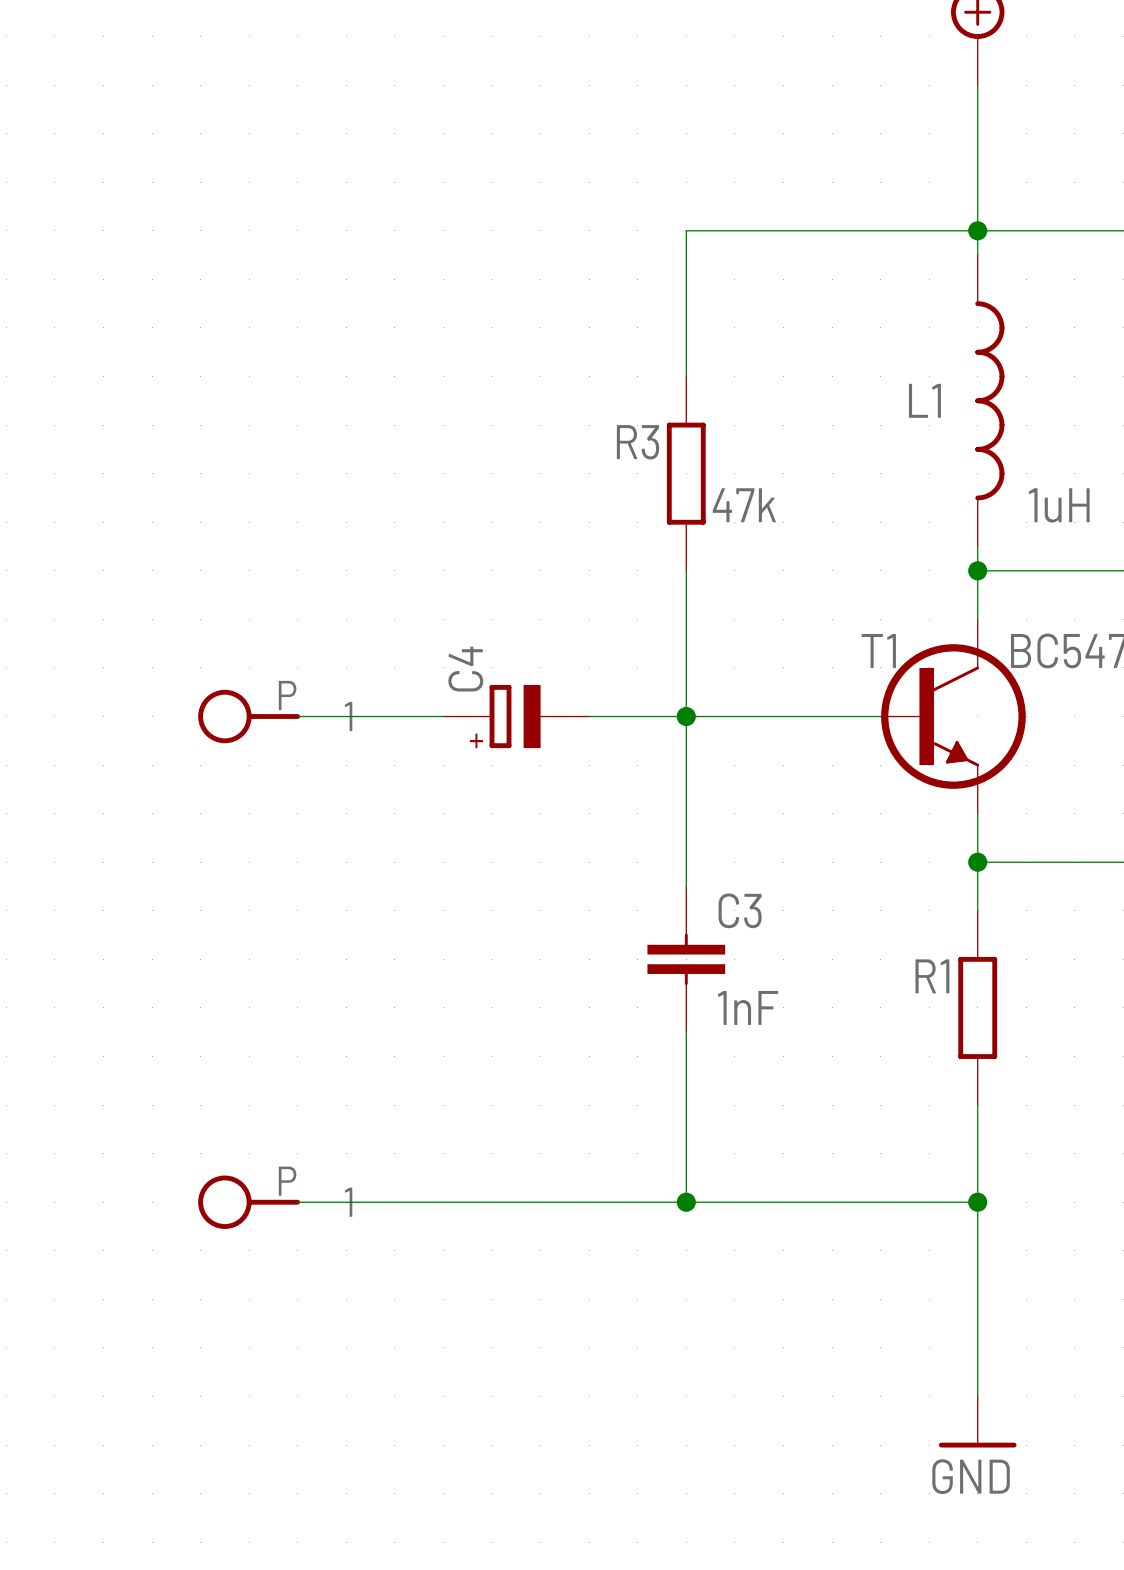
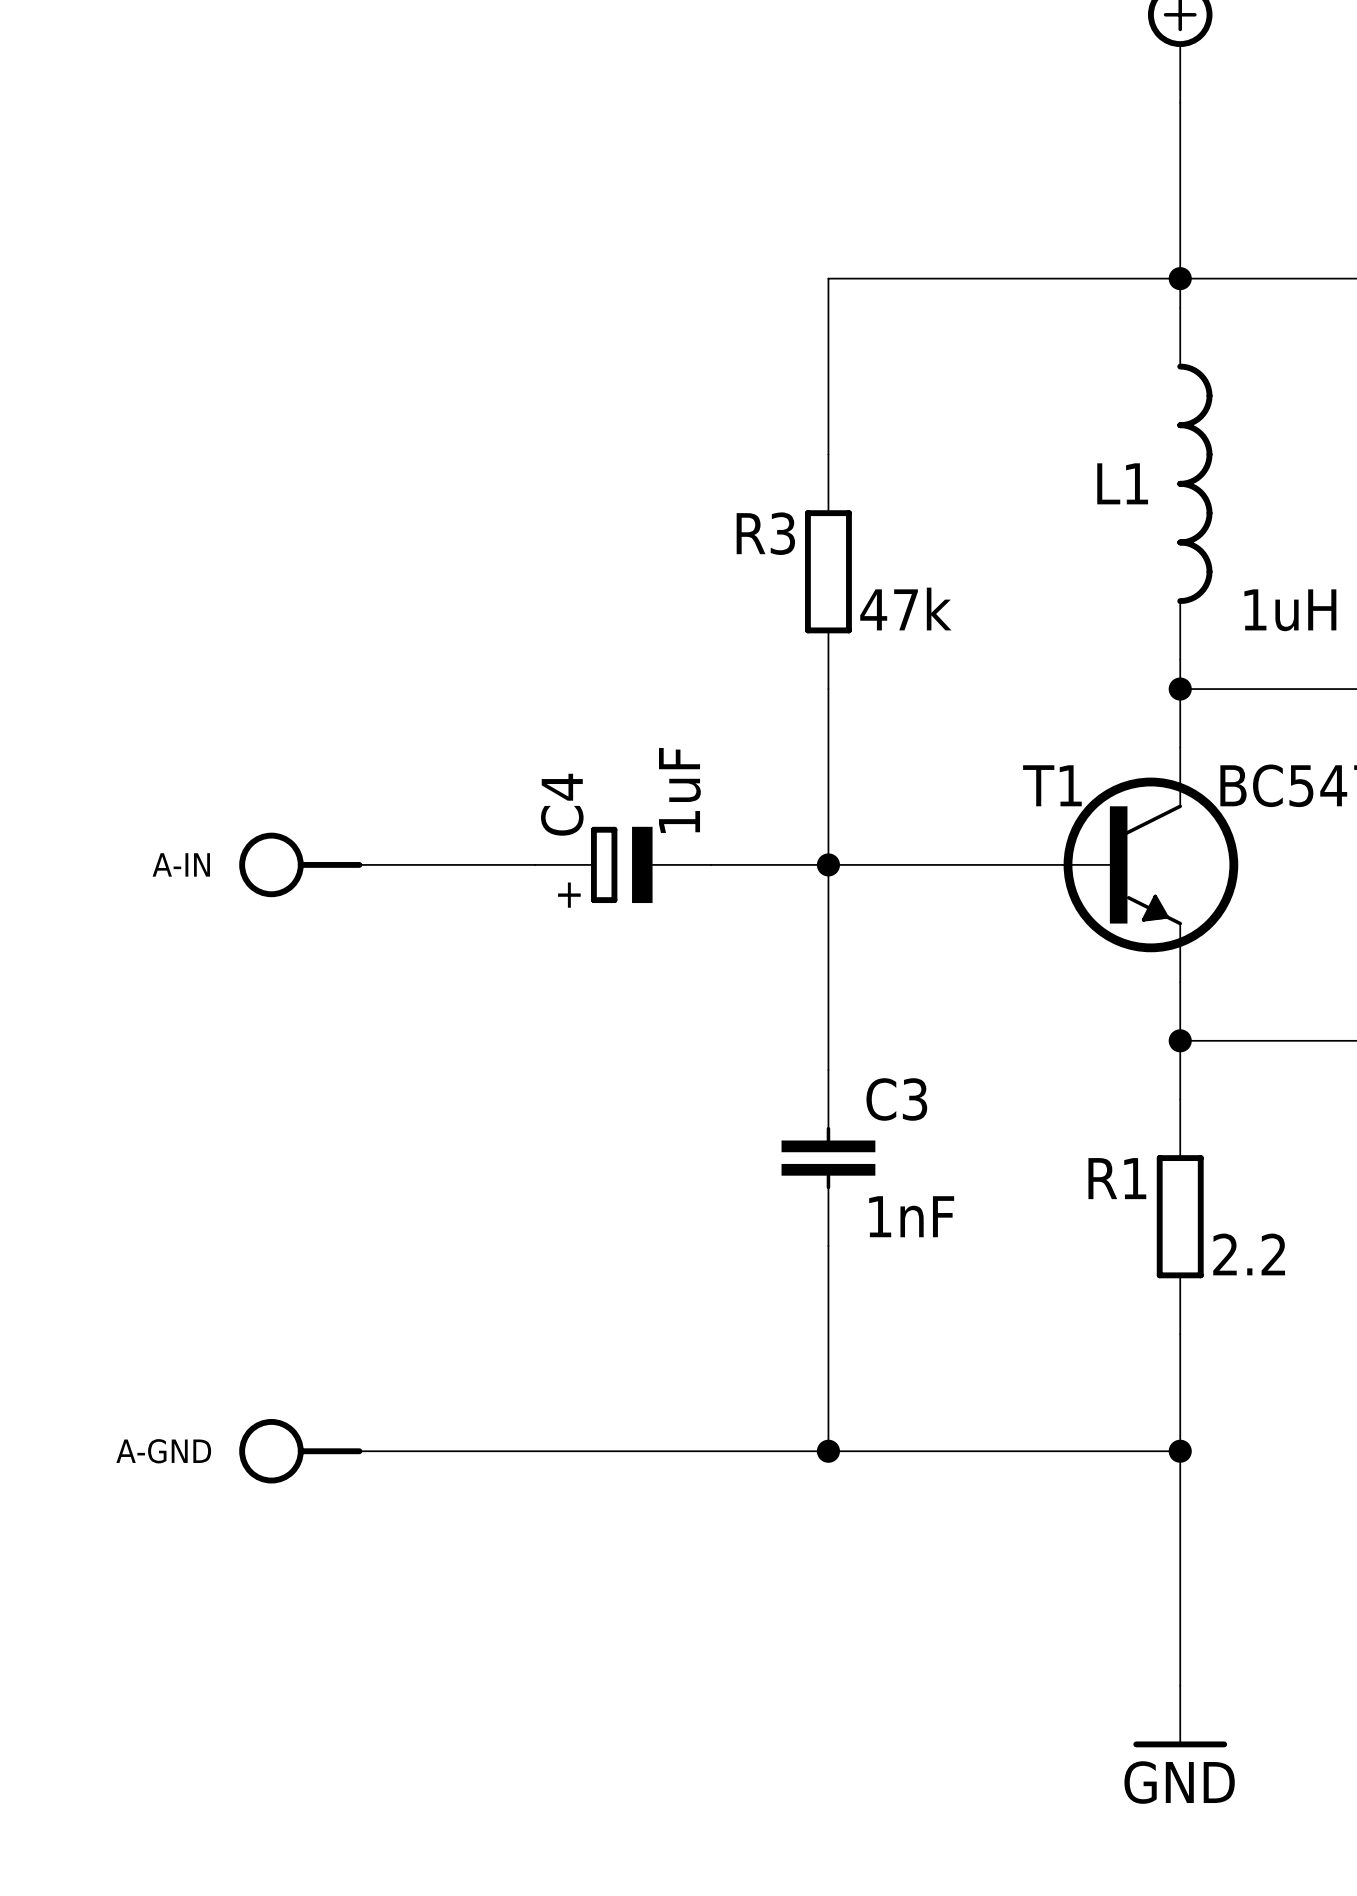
C4 value: none -> 1uF (679, 790)
A-IN pin number: P (287, 695) -> none
A-IN name: none -> A-IN (181, 864)
A-IN pin name: 1 (348, 716) -> none
R1 value: none -> 2.2 (1249, 1254)
A-GND pin number: P (287, 1181) -> none
A-GND name: none -> A-GND (163, 1451)
A-GND pin name: 1 (348, 1202) -> none

